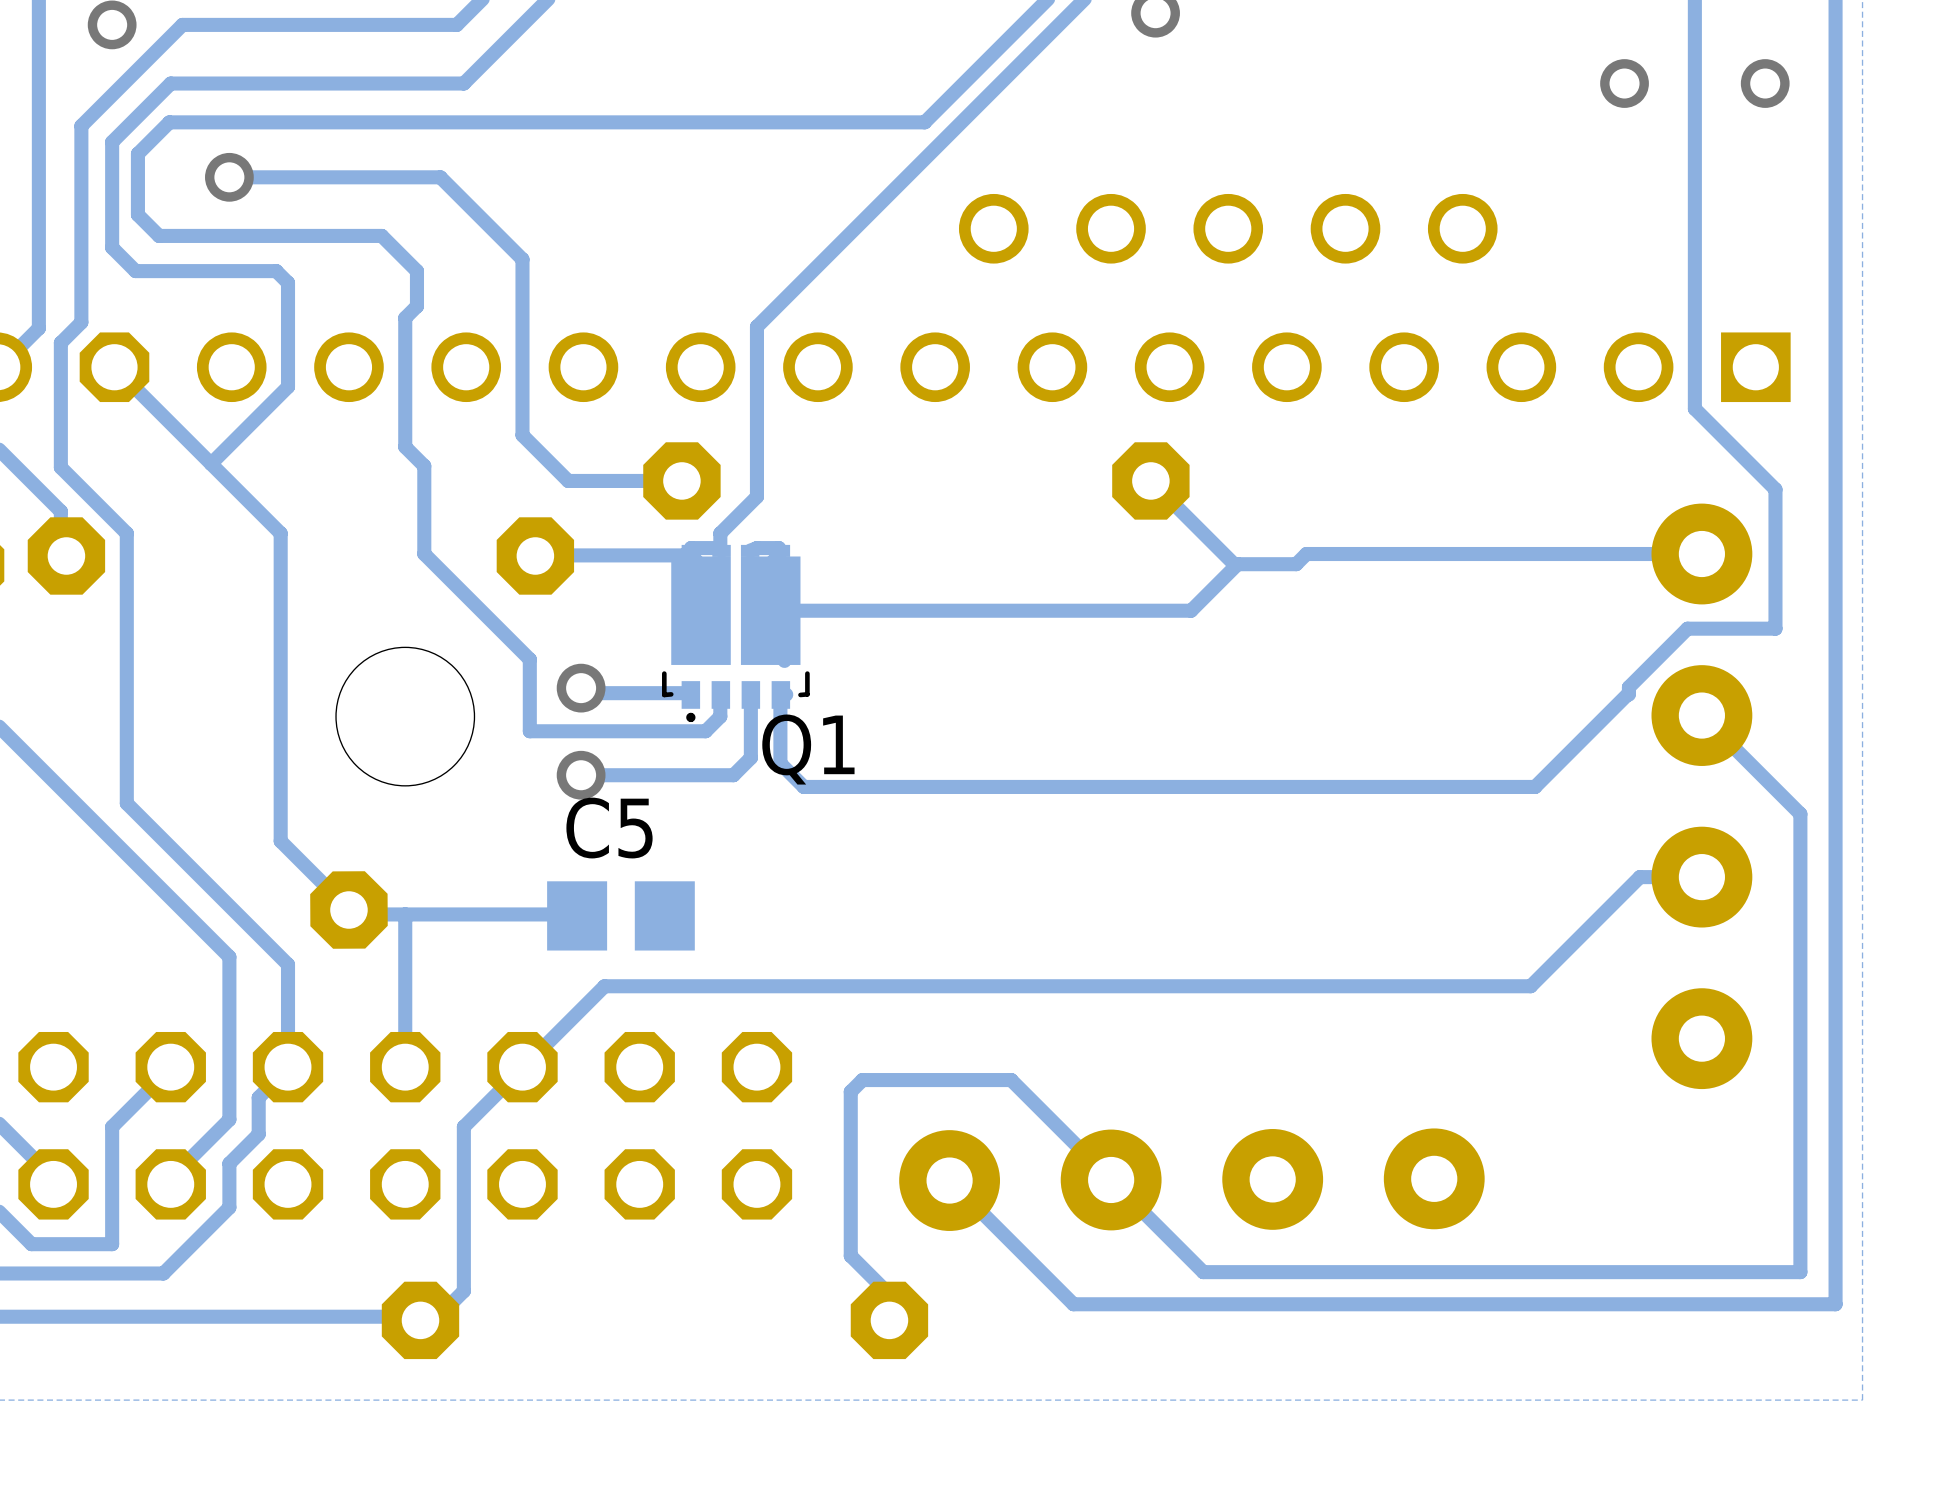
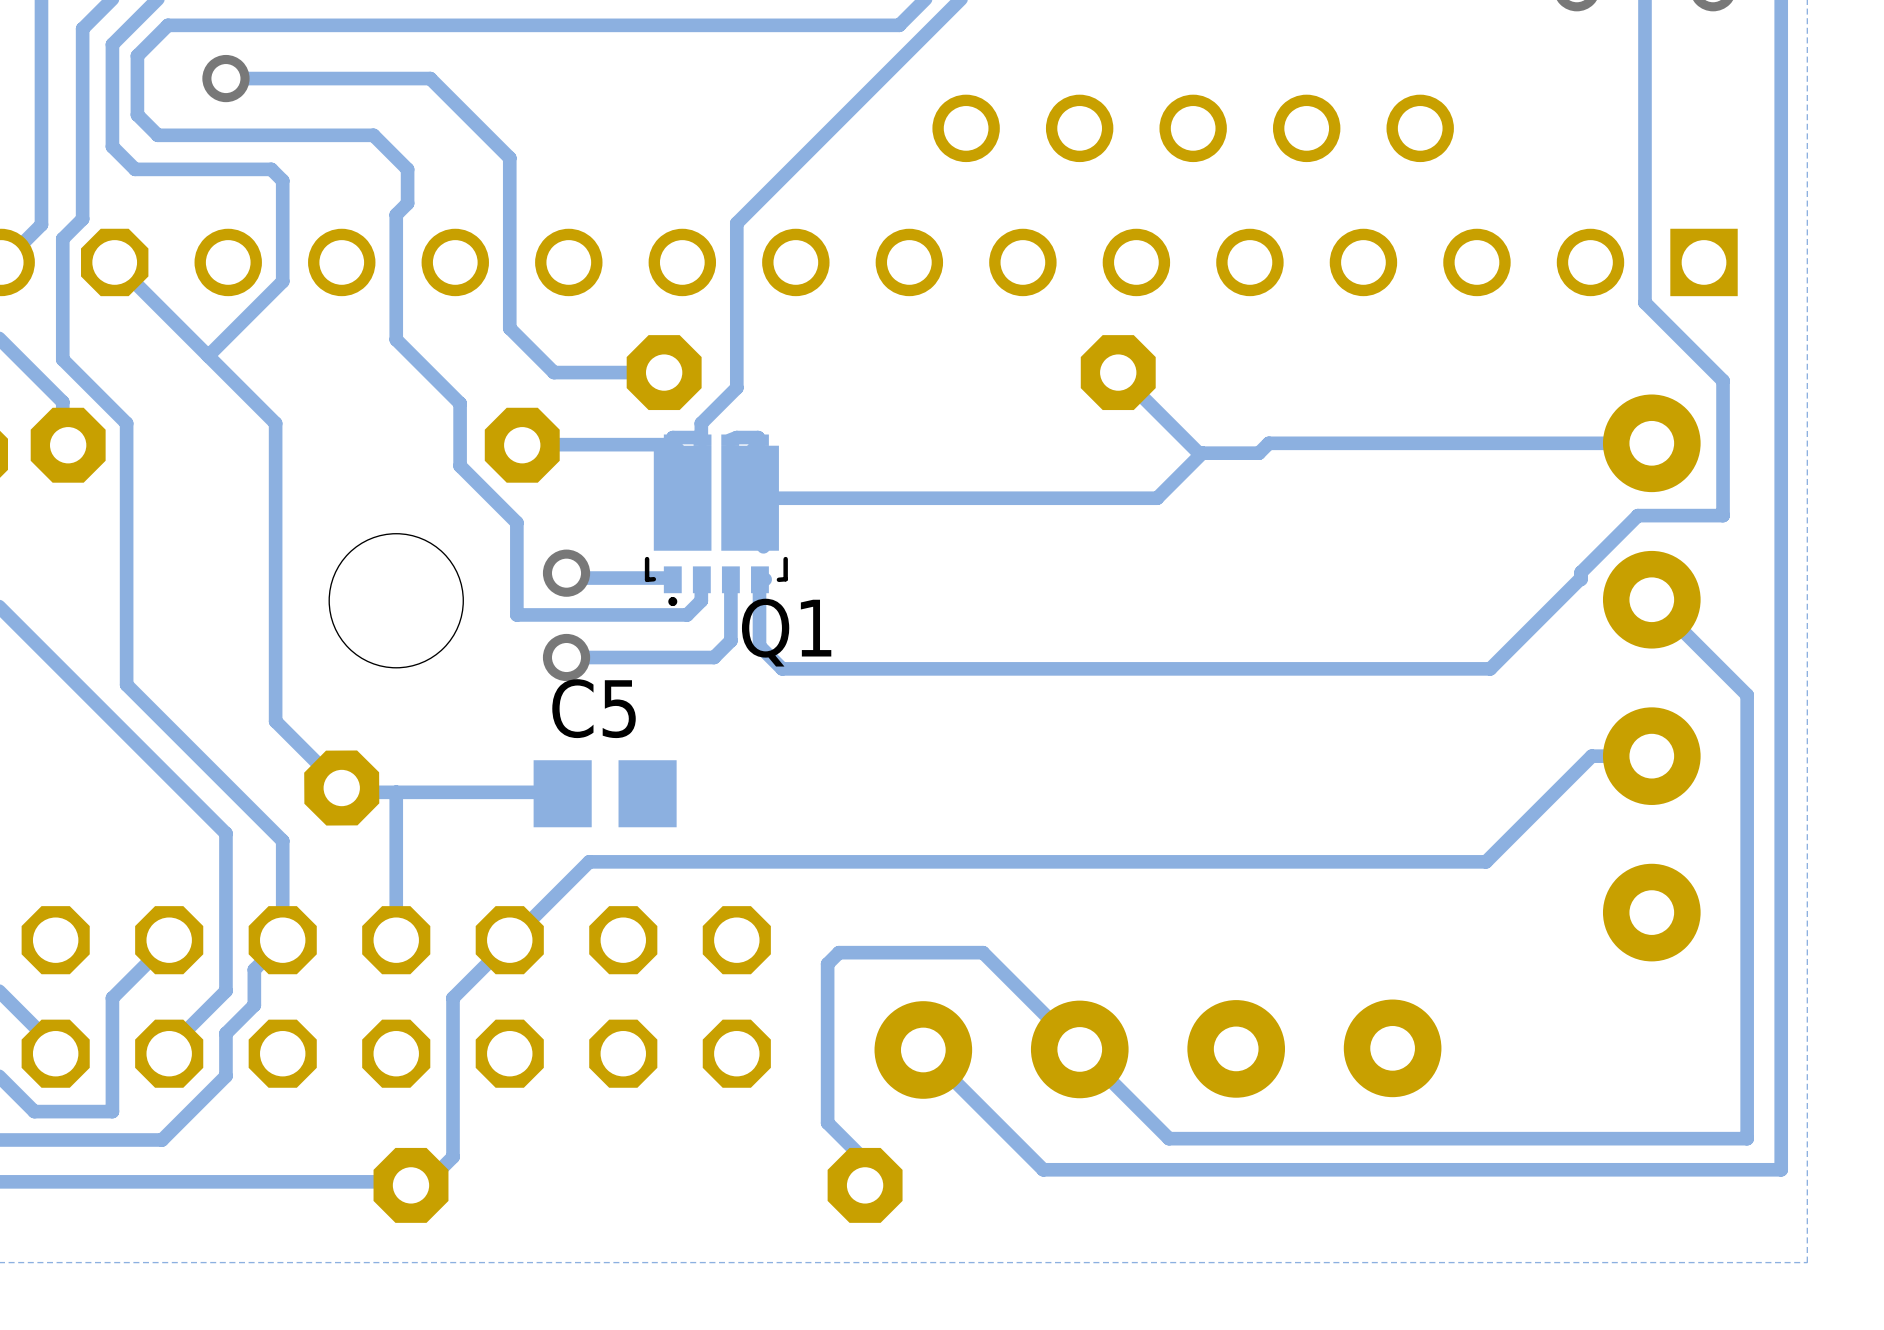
track: (424, 466) (424, 553) (529, 659) -> (414, 358) (460, 403) (460, 465) (516, 522) (516, 545)

